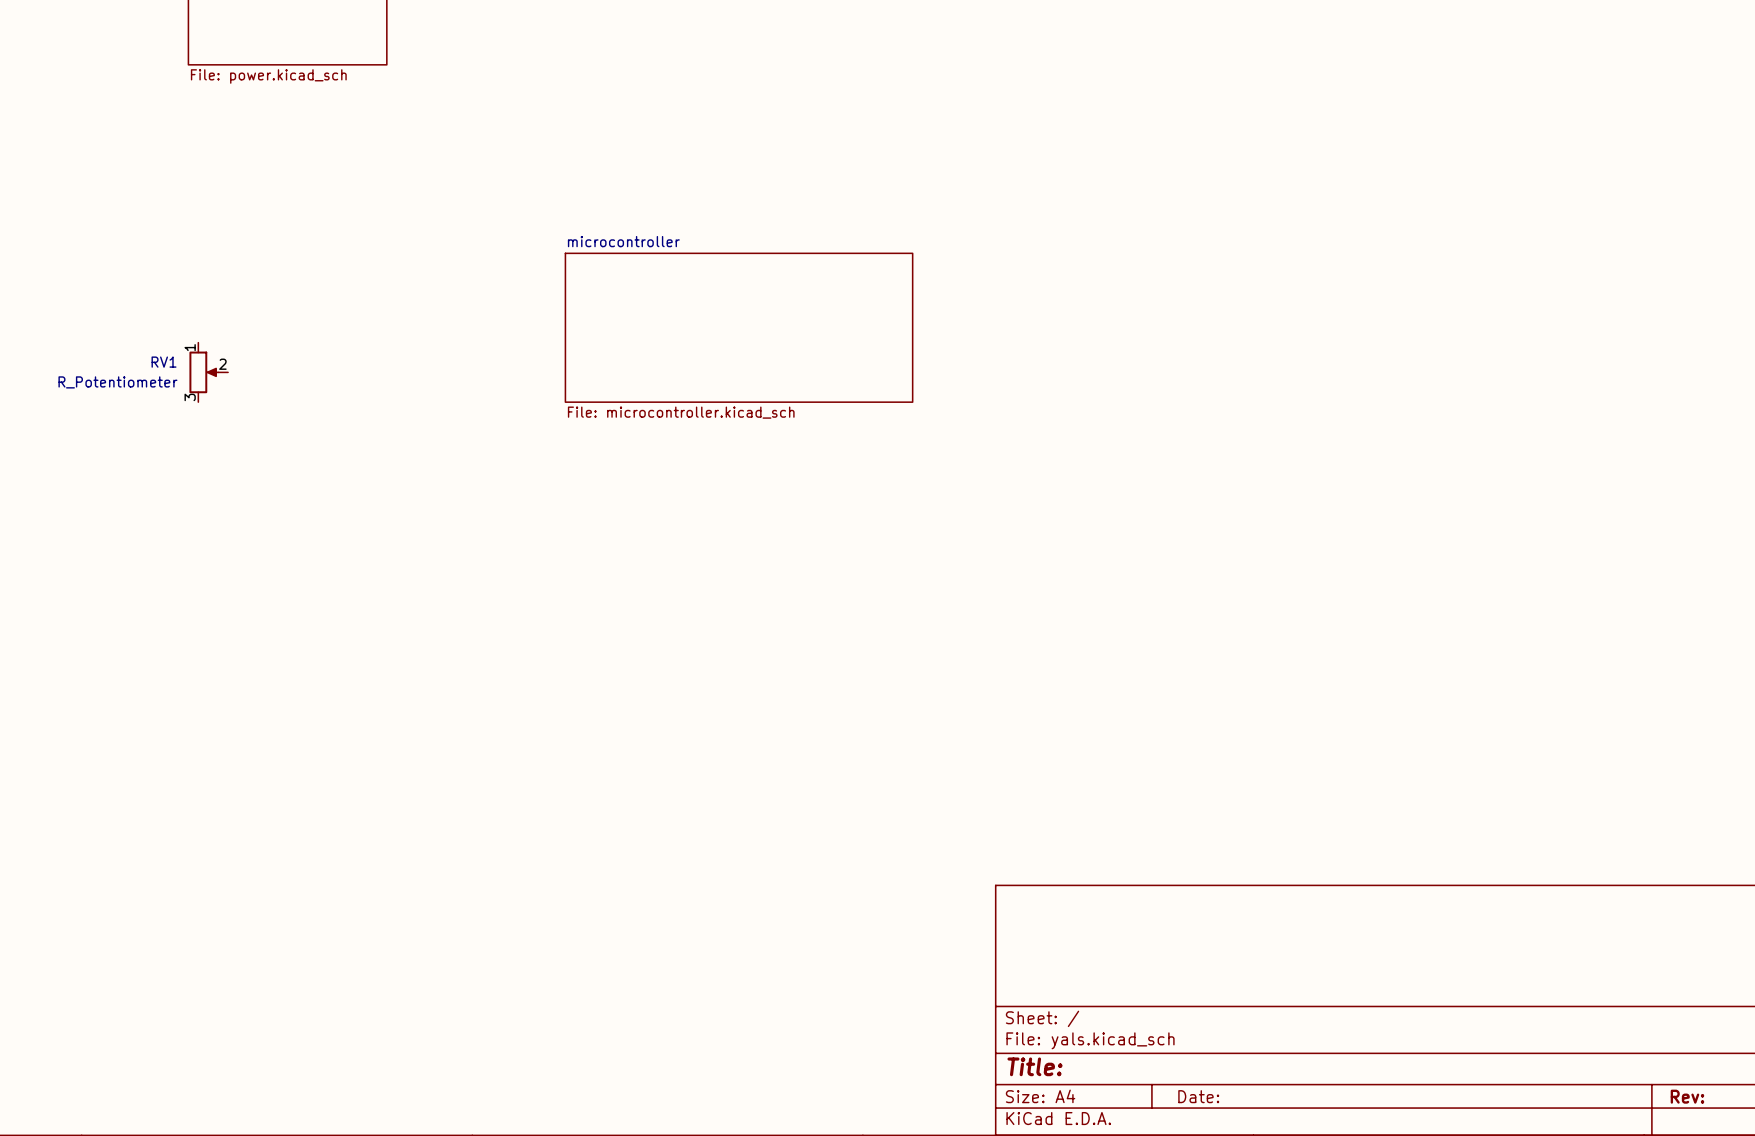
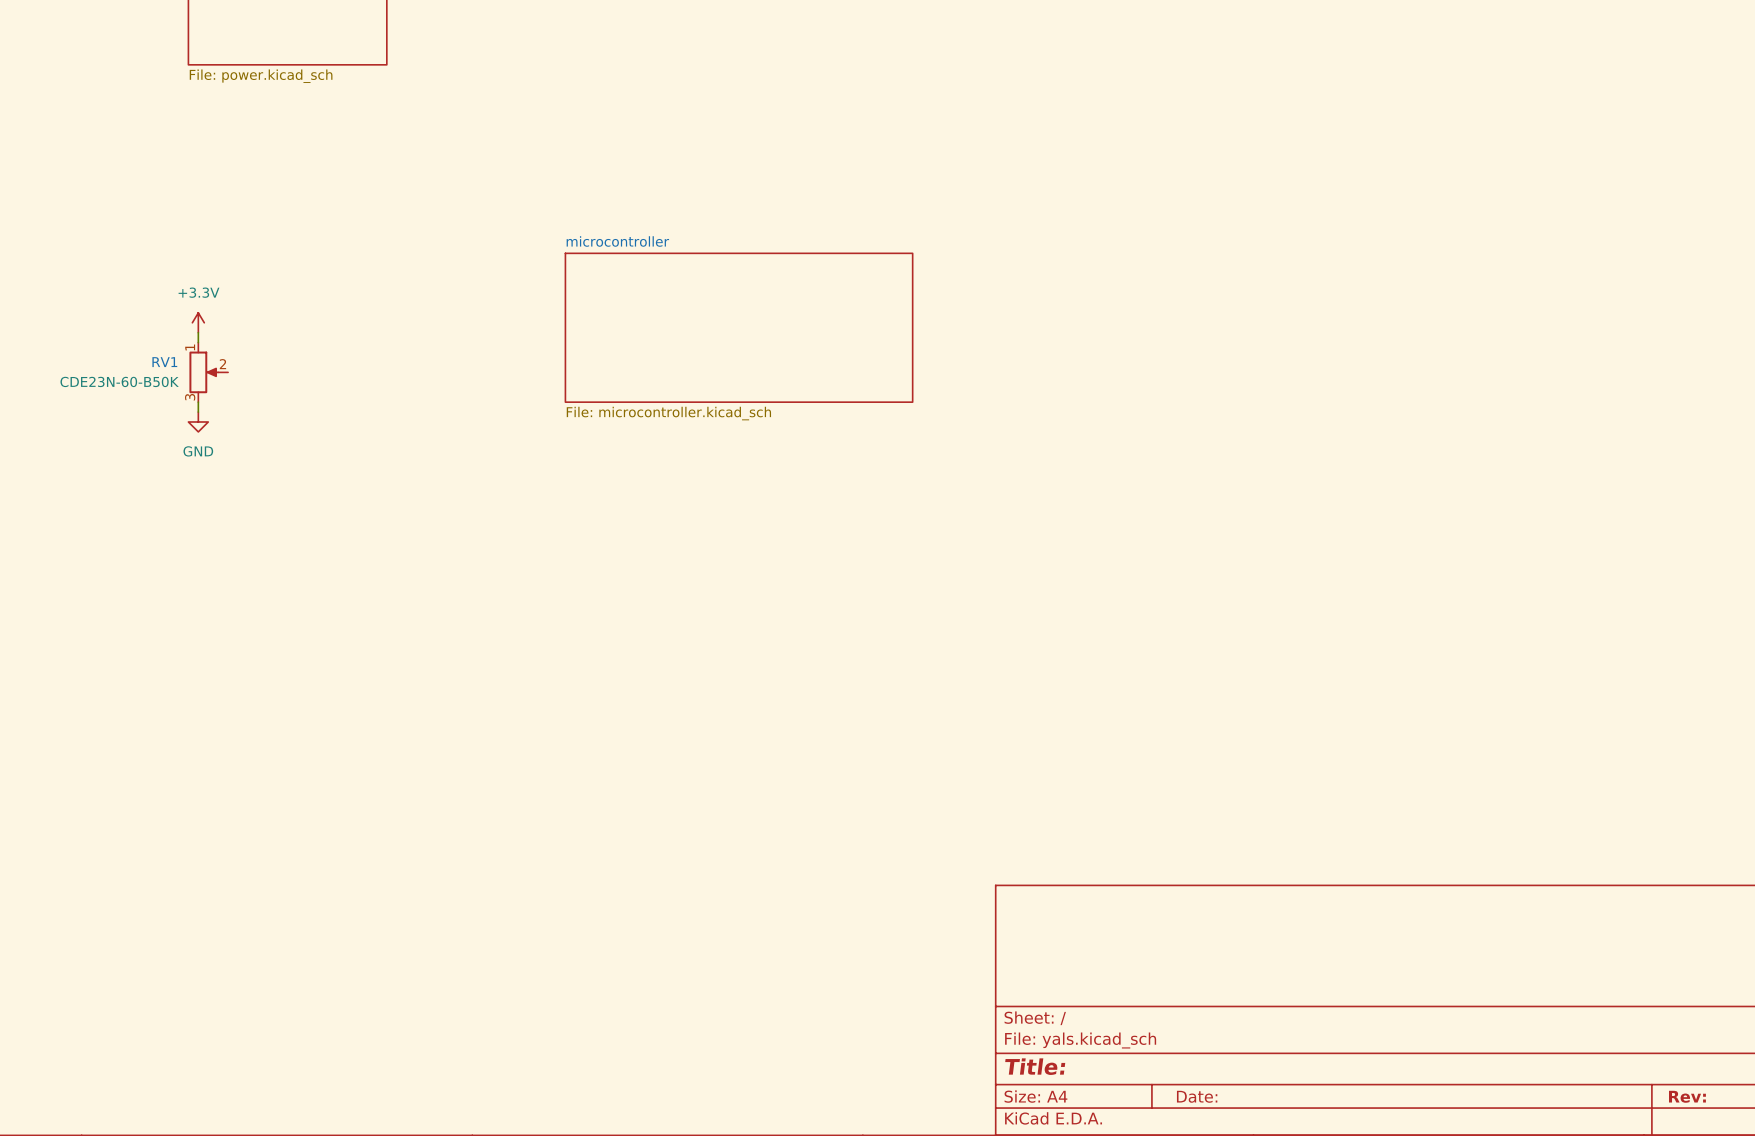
power symbol: none -> +3.3V (198, 322)
wire: none -> (198, 332) (198, 342)
RV1 value: R_Potentiometer (117, 382) -> CDE23N-60-B50K (119, 381)
wire: none -> (198, 402) (198, 412)
power symbol: none -> GND (198, 422)

